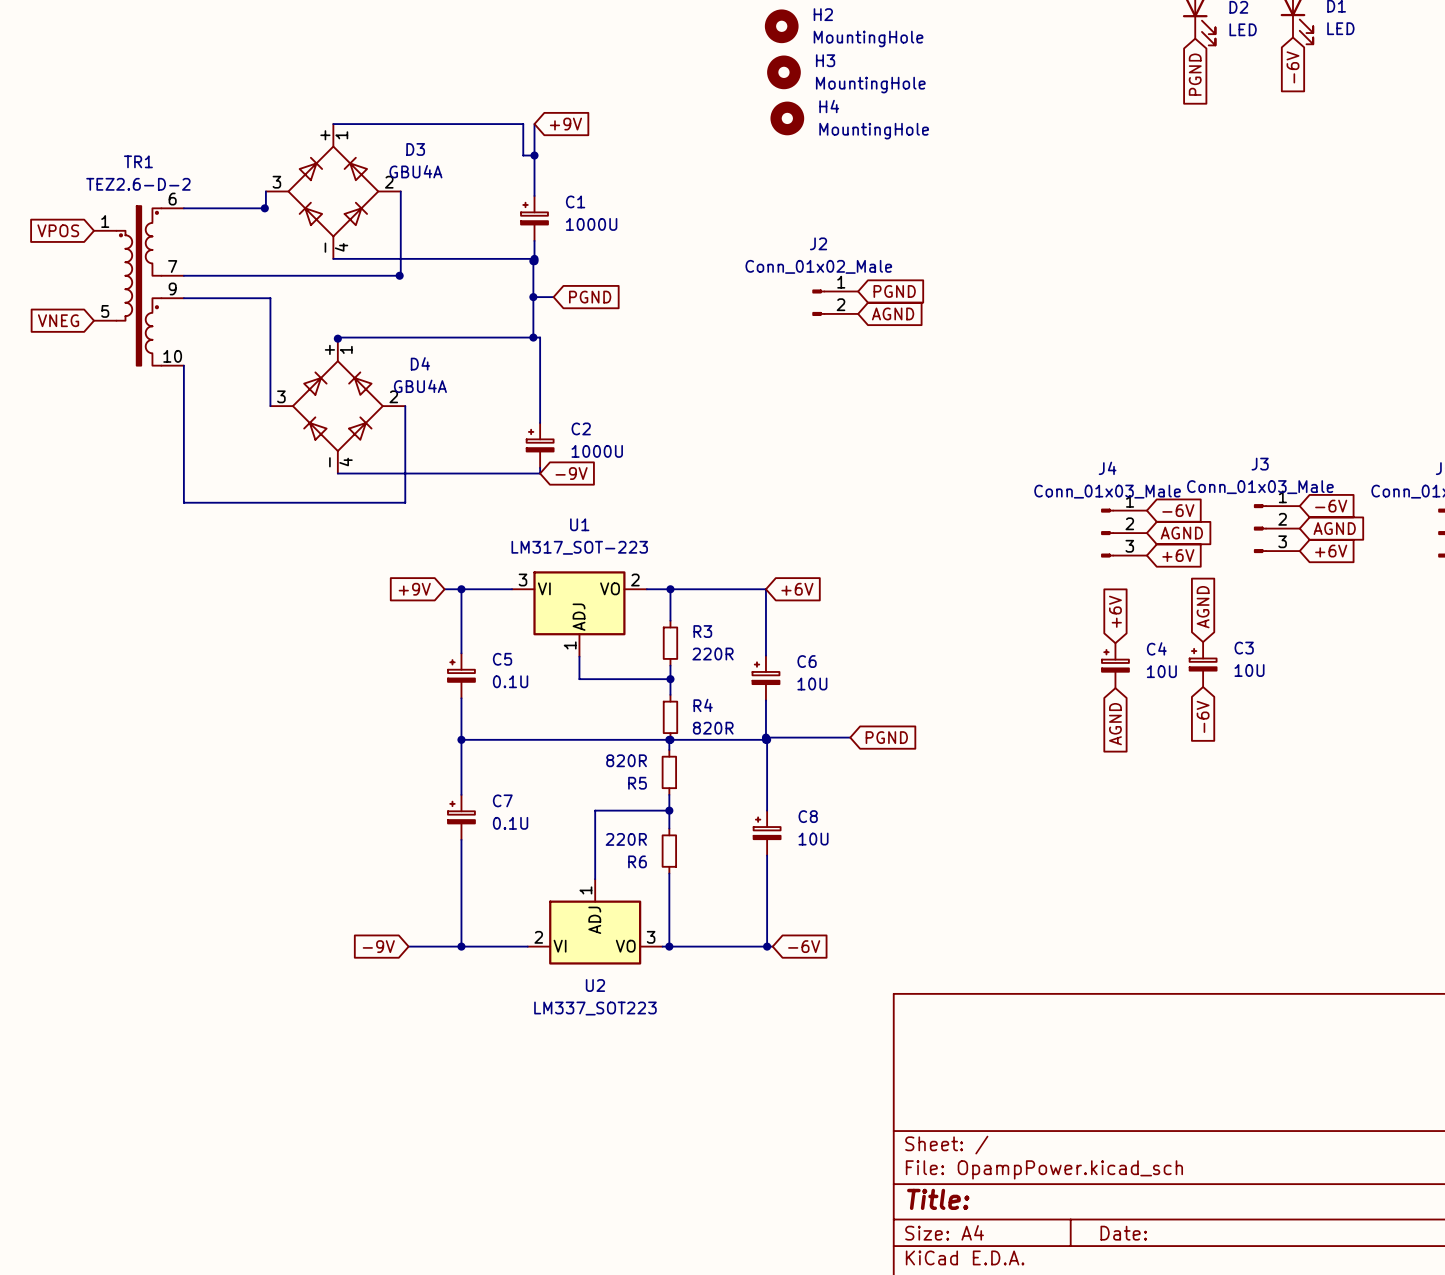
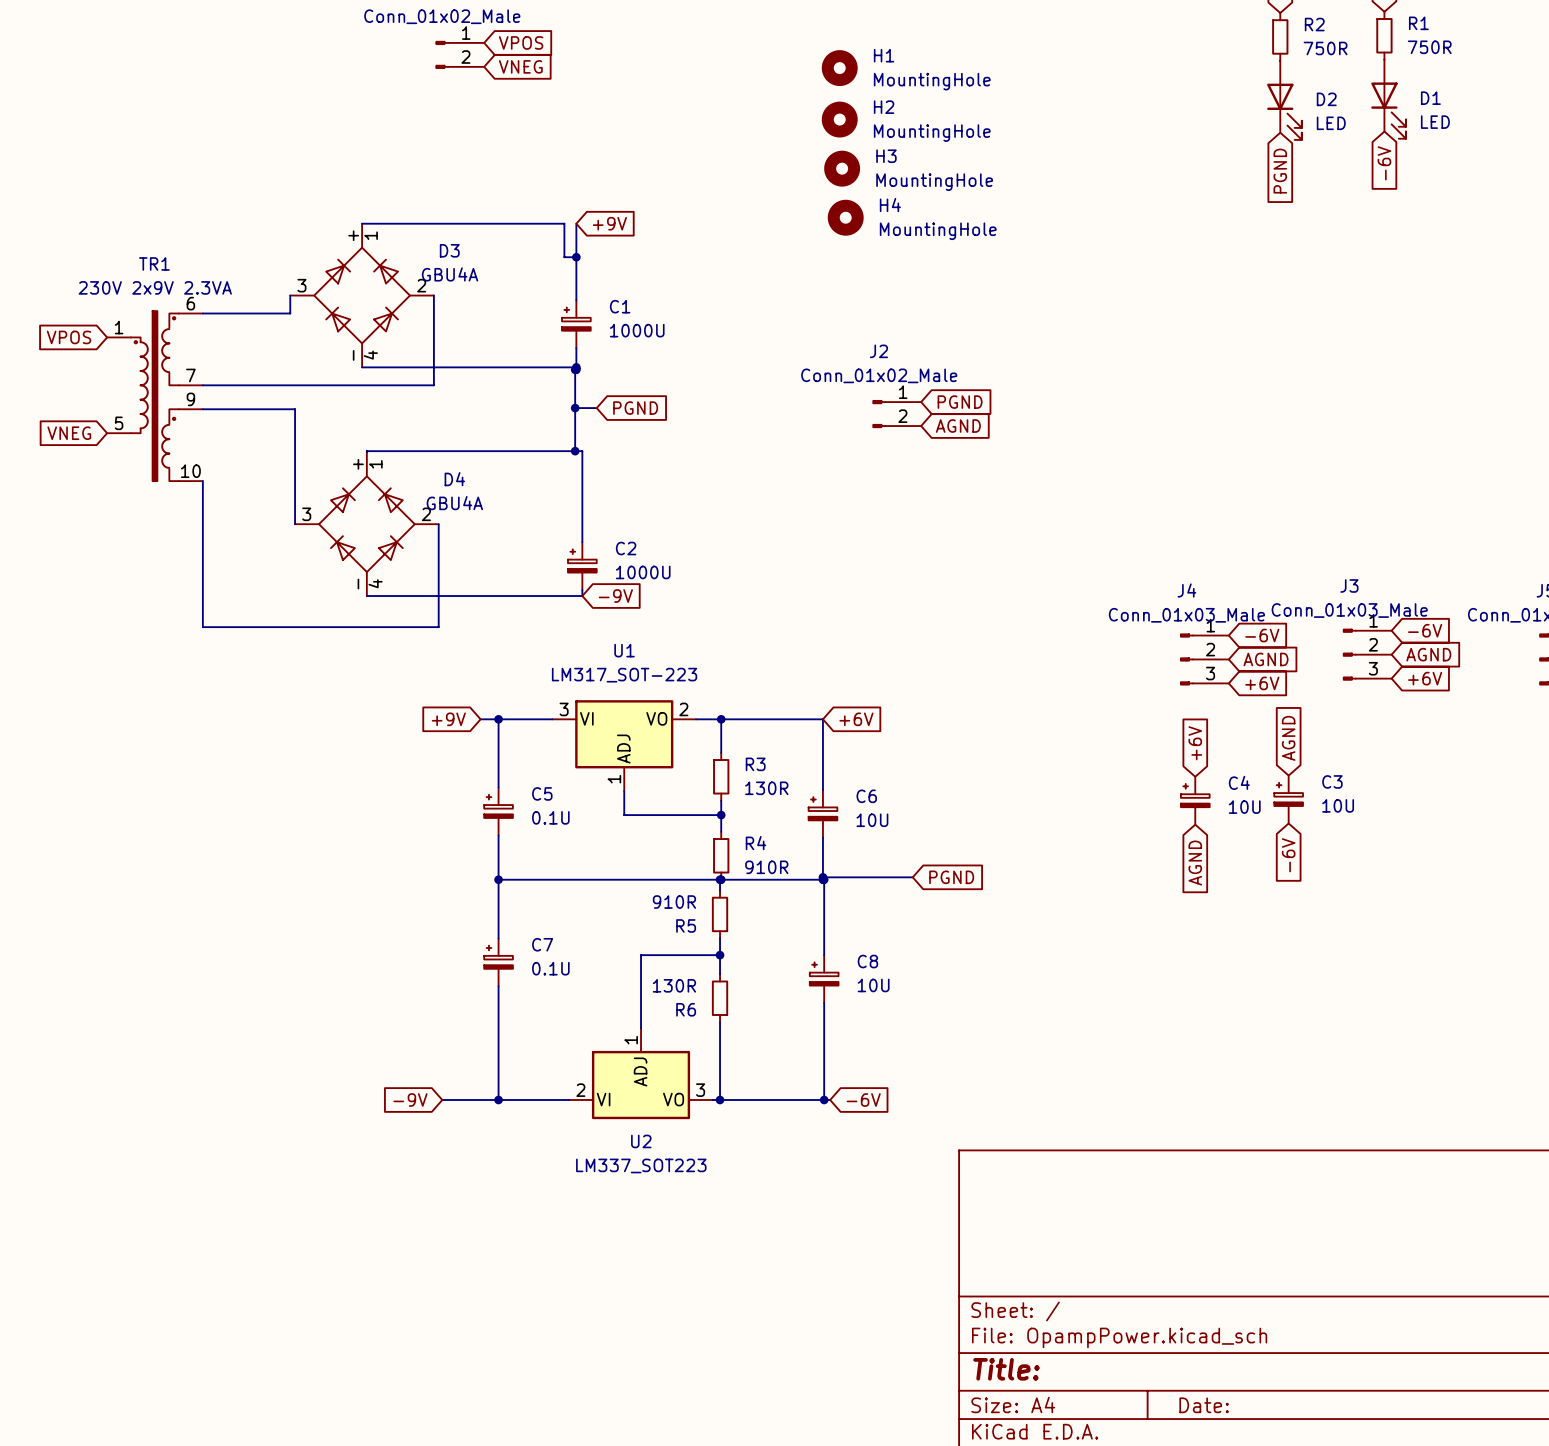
TR1 value: TEZ2.6-D-2 (138, 184) -> 230V 2x9V 2.3VA (155, 287)
junction: (264, 208) -> none
junction: (399, 275) -> none
junction: (337, 338) -> none
R3 value: 220R (712, 654) -> 130R (766, 788)
R4 value: 820R (713, 728) -> 910R (766, 867)
R5 value: 820R (626, 760) -> 910R (674, 902)
R6 value: 220R (626, 839) -> 130R (674, 985)

